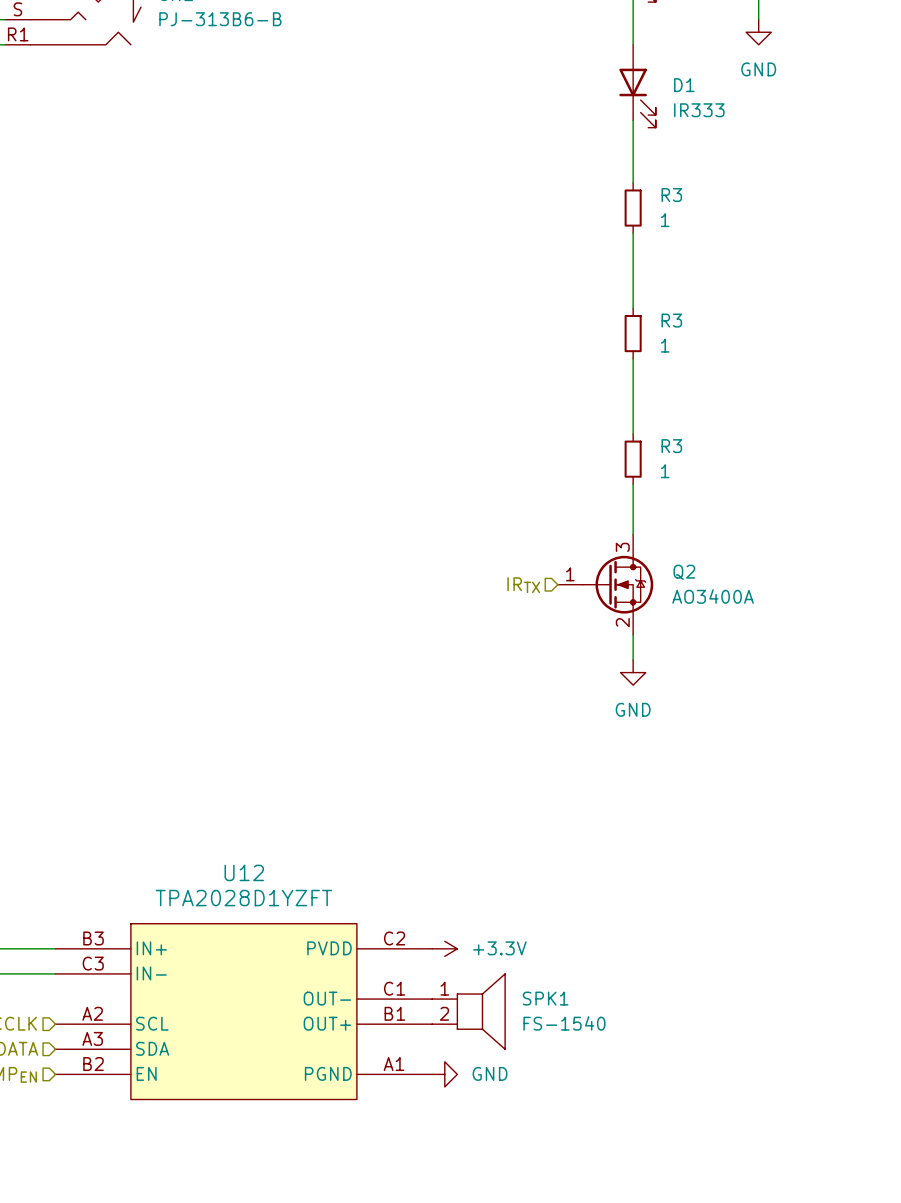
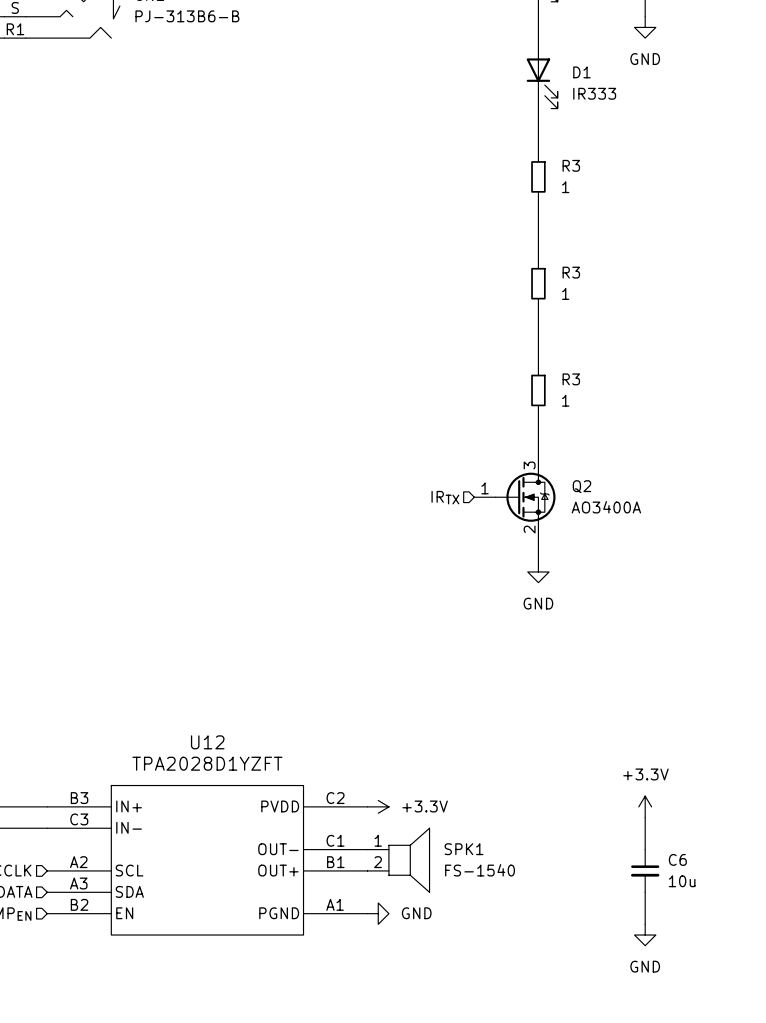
power symbol: none -> +3.3V (645, 806)
wire: none -> (645, 817) (645, 849)
C6: none -> 10u (645, 870)
wire: none -> (645, 892) (645, 924)
power symbol: none -> GND (645, 935)

